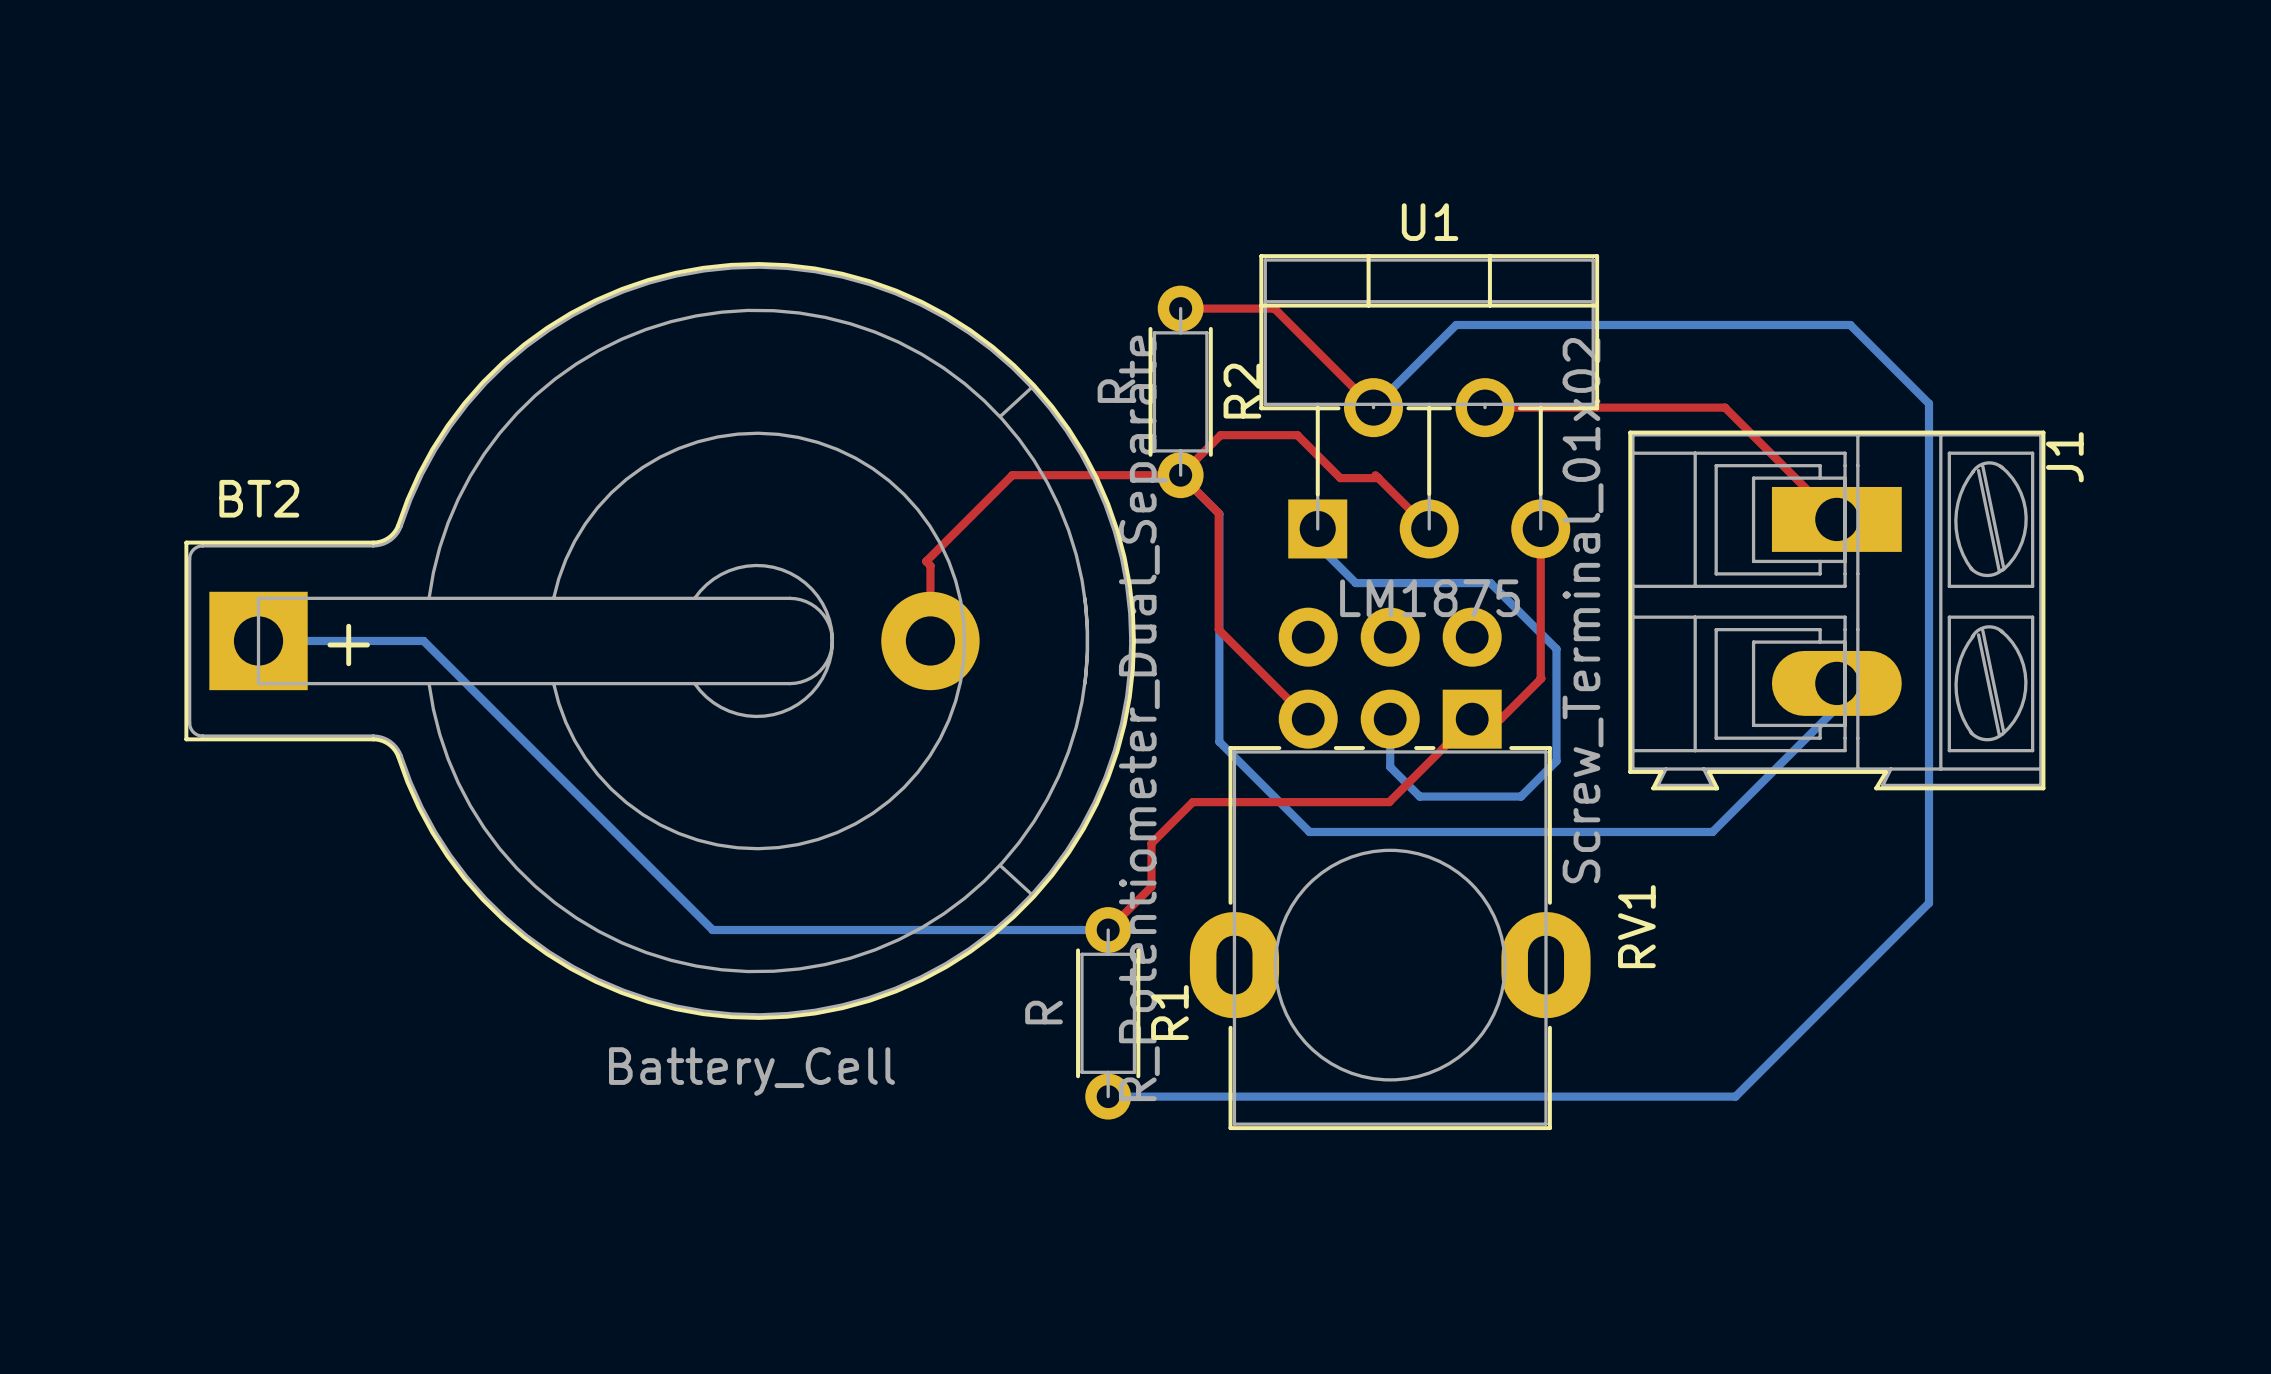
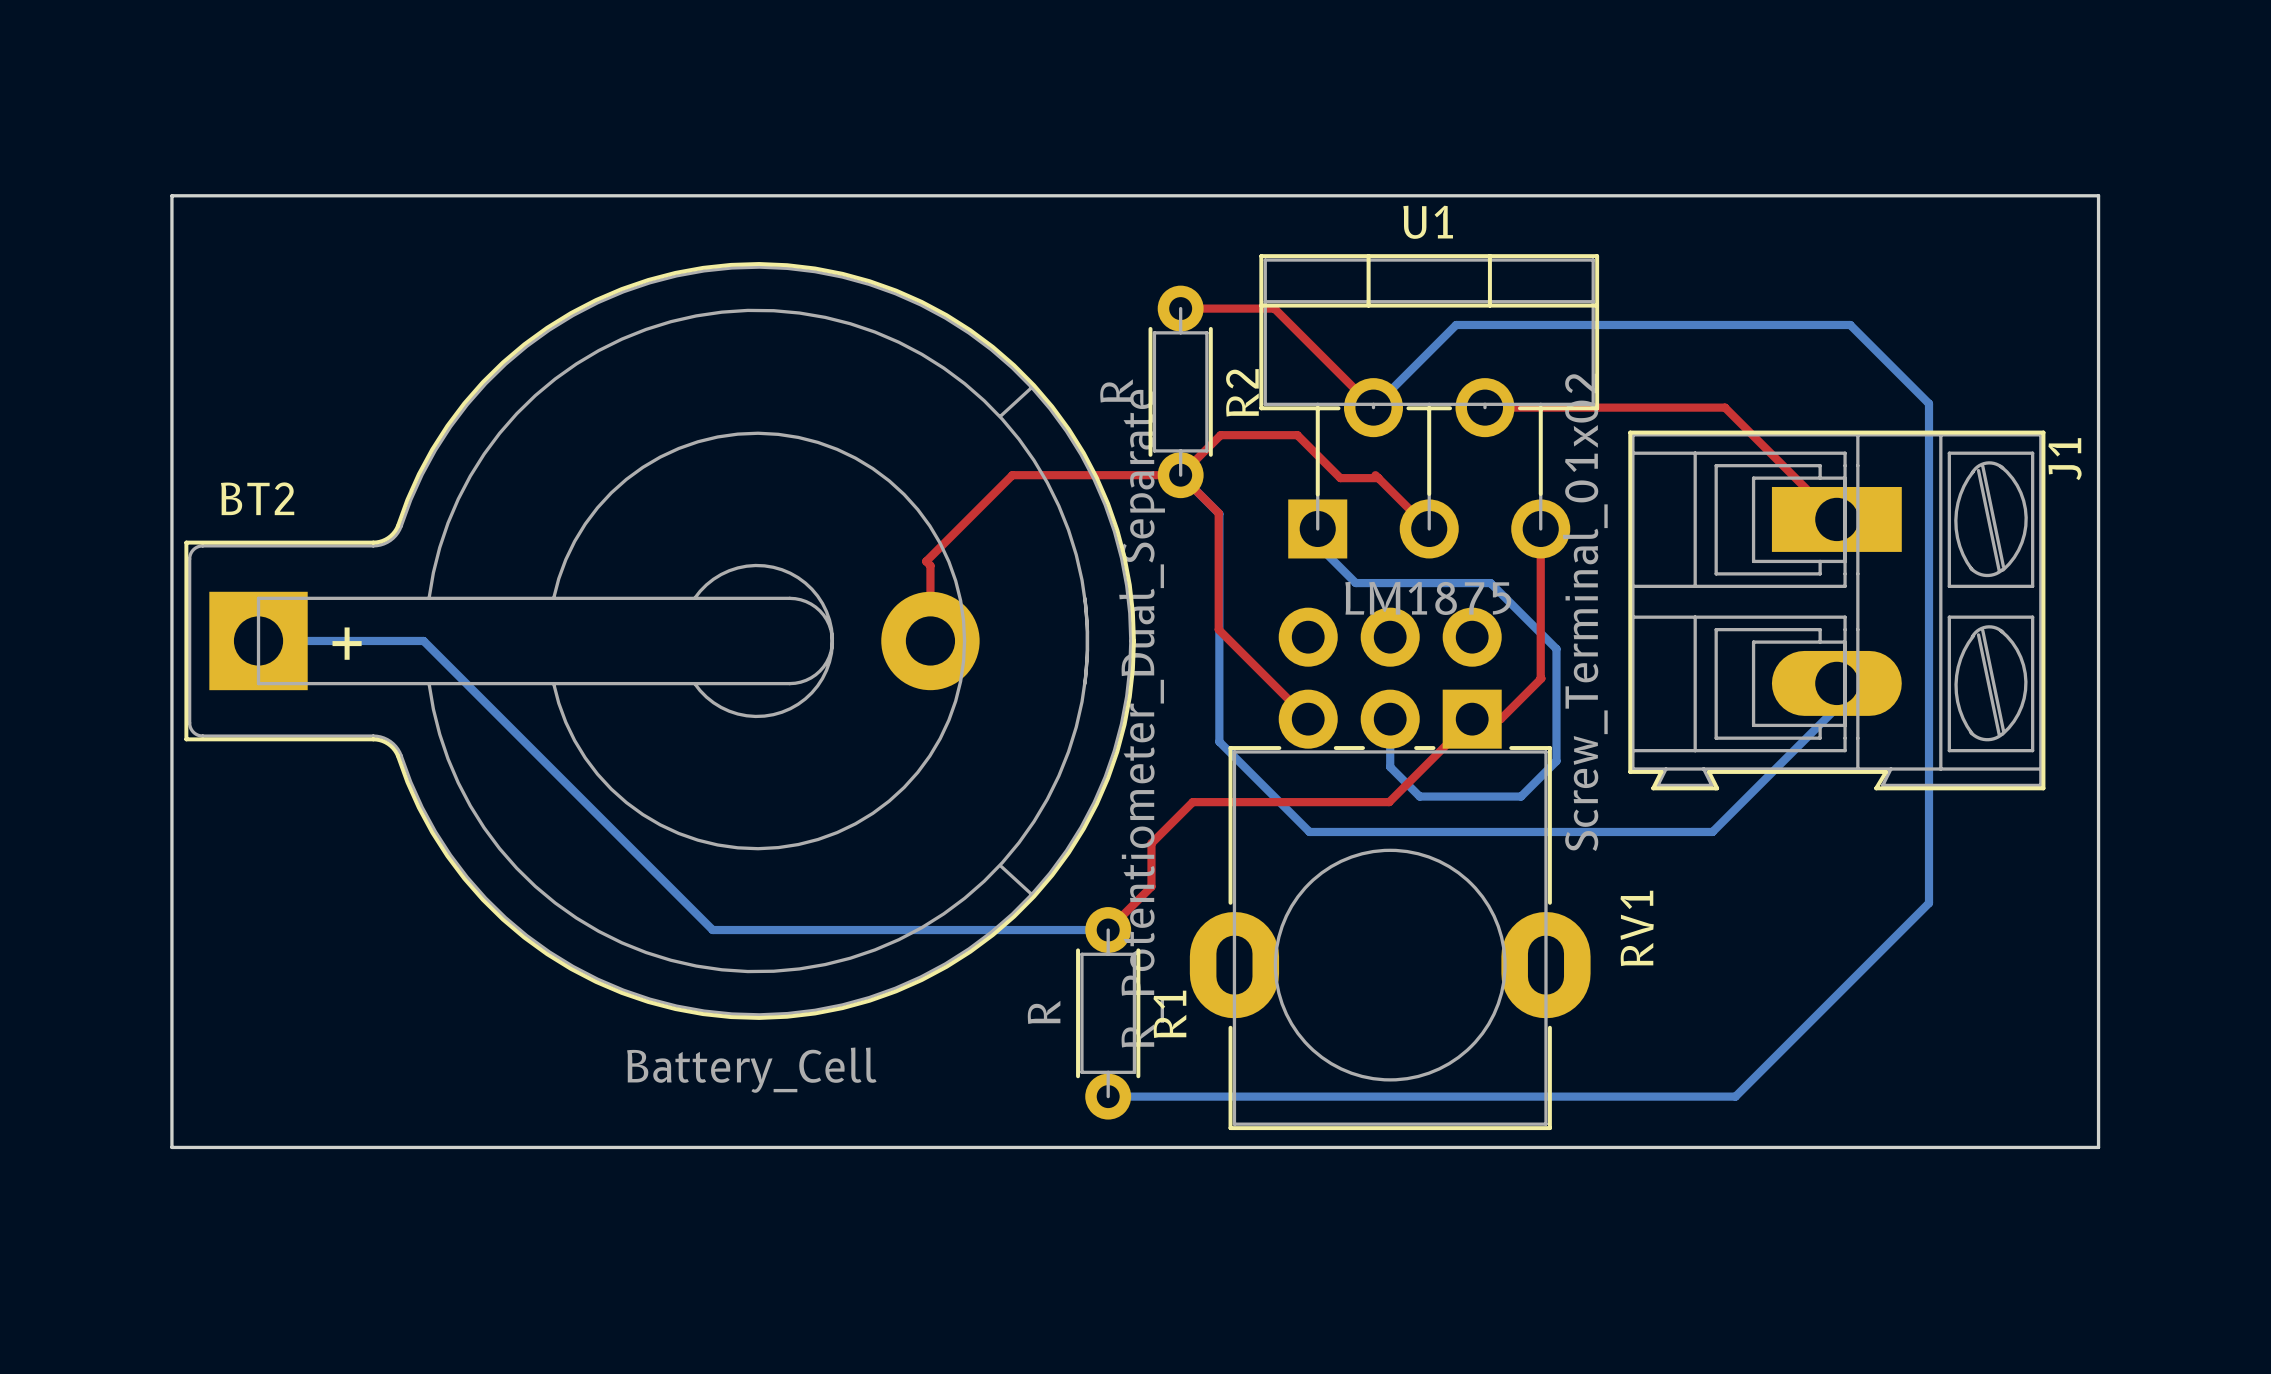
board edge: none -> (171, 195) (2098, 195) (2098, 1147) (171, 1147) (171, 195)

